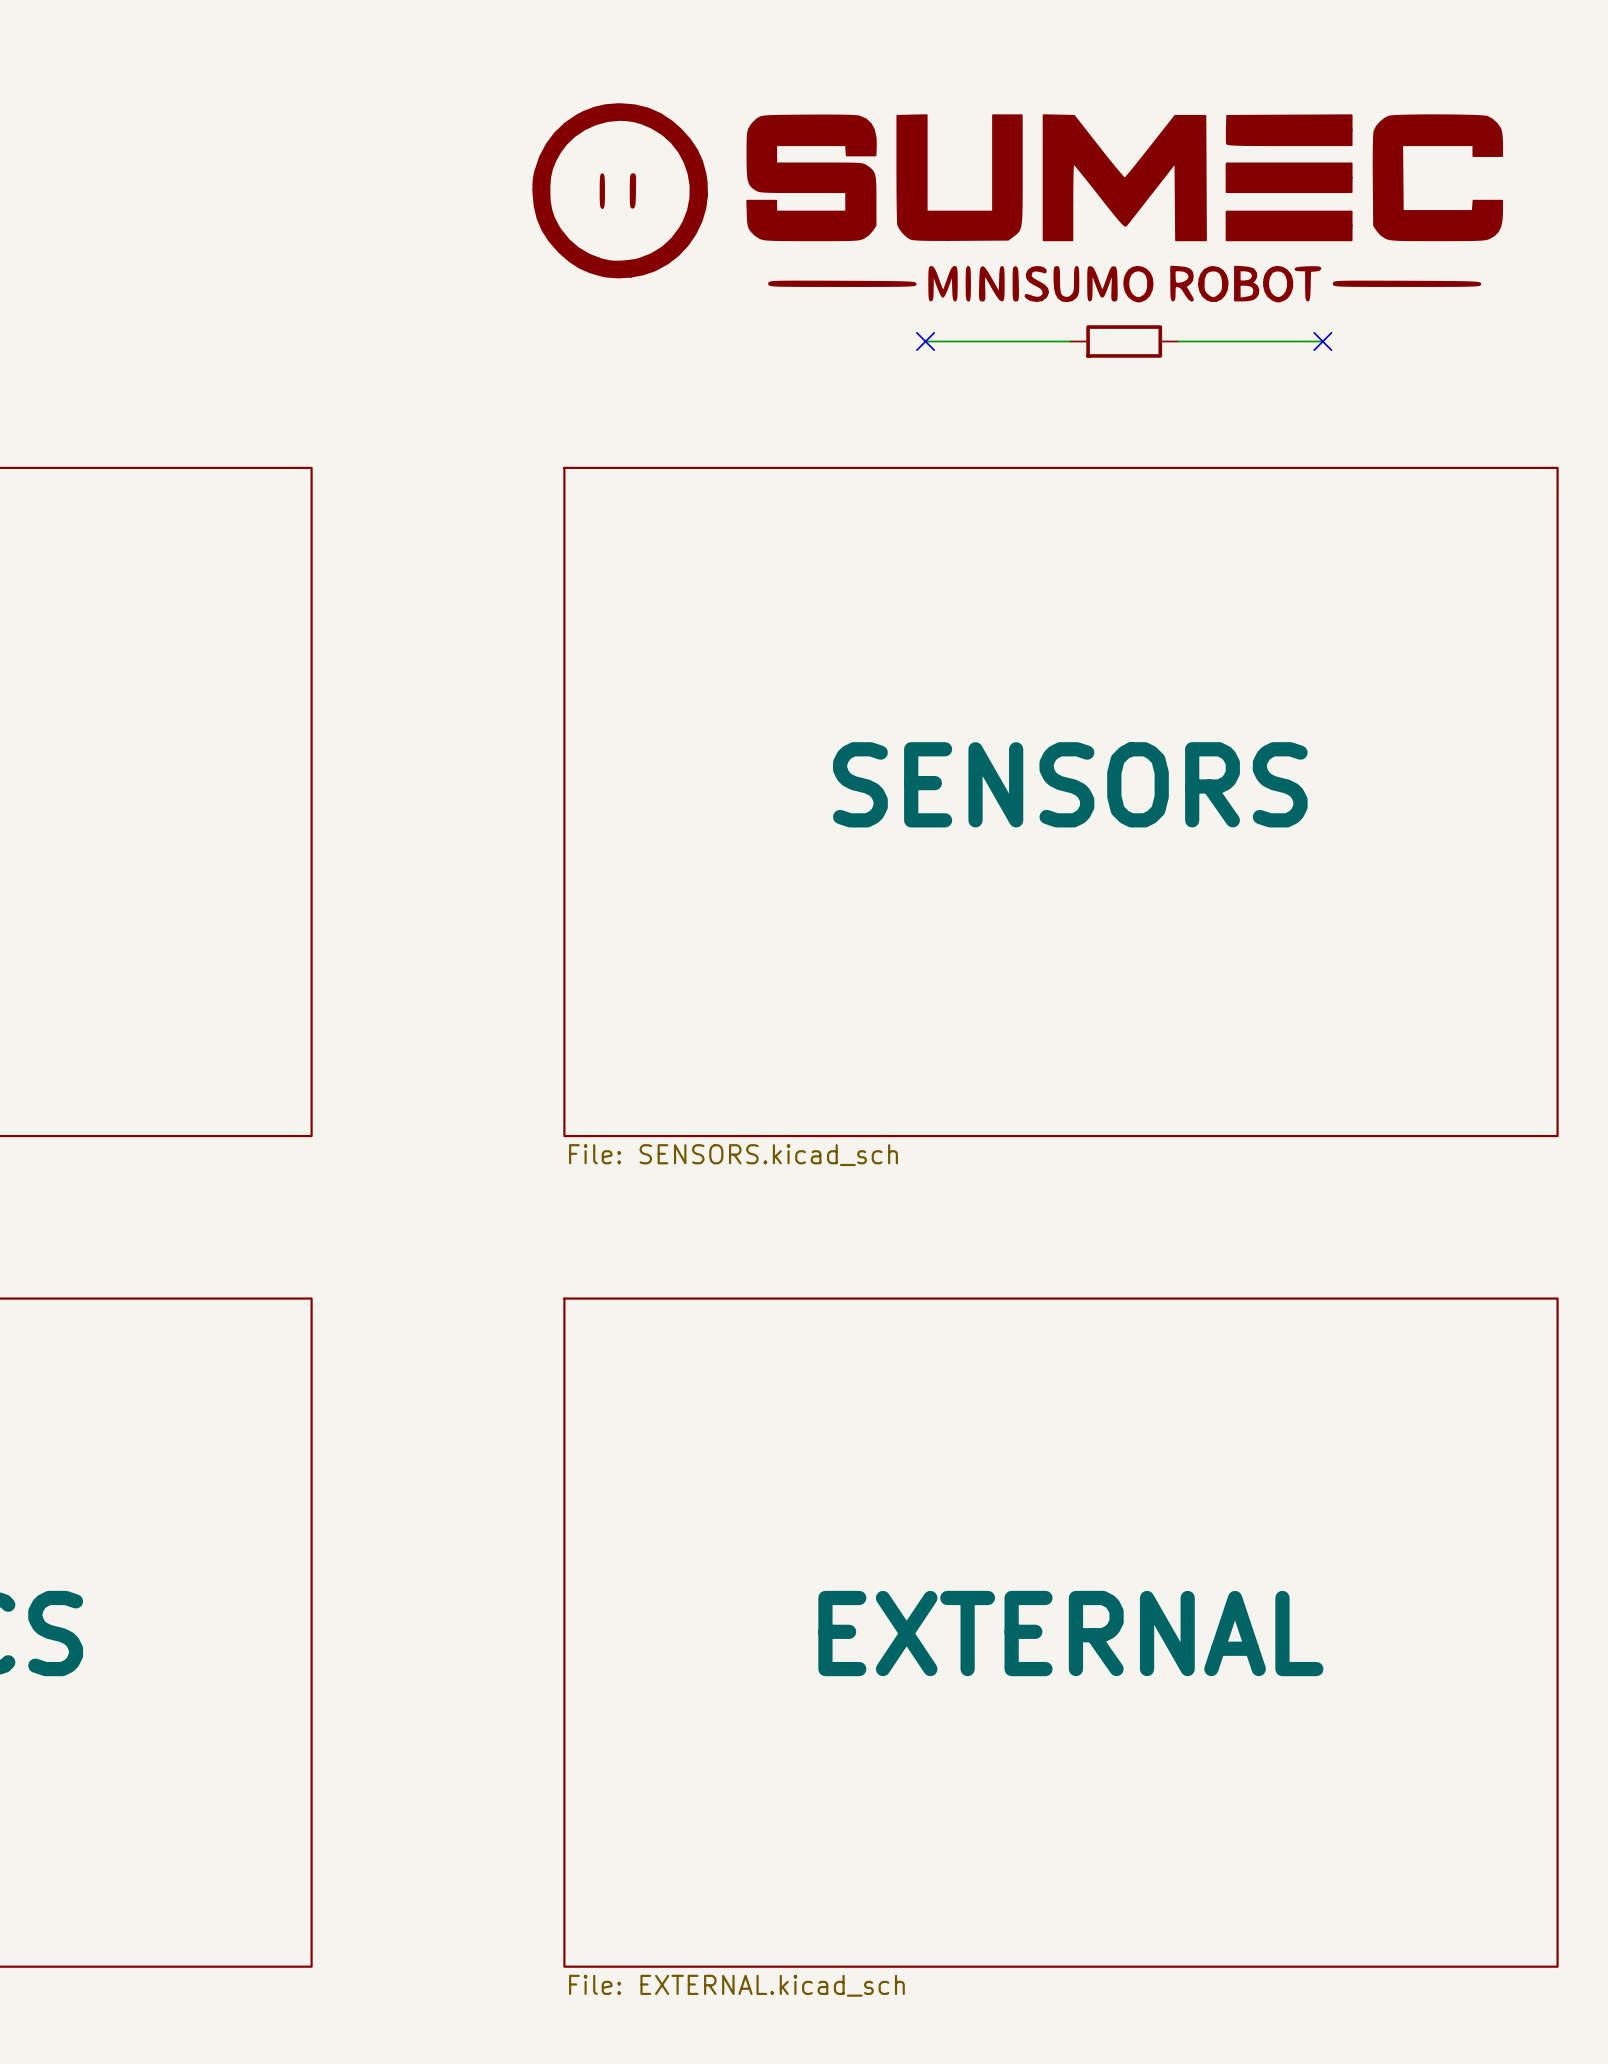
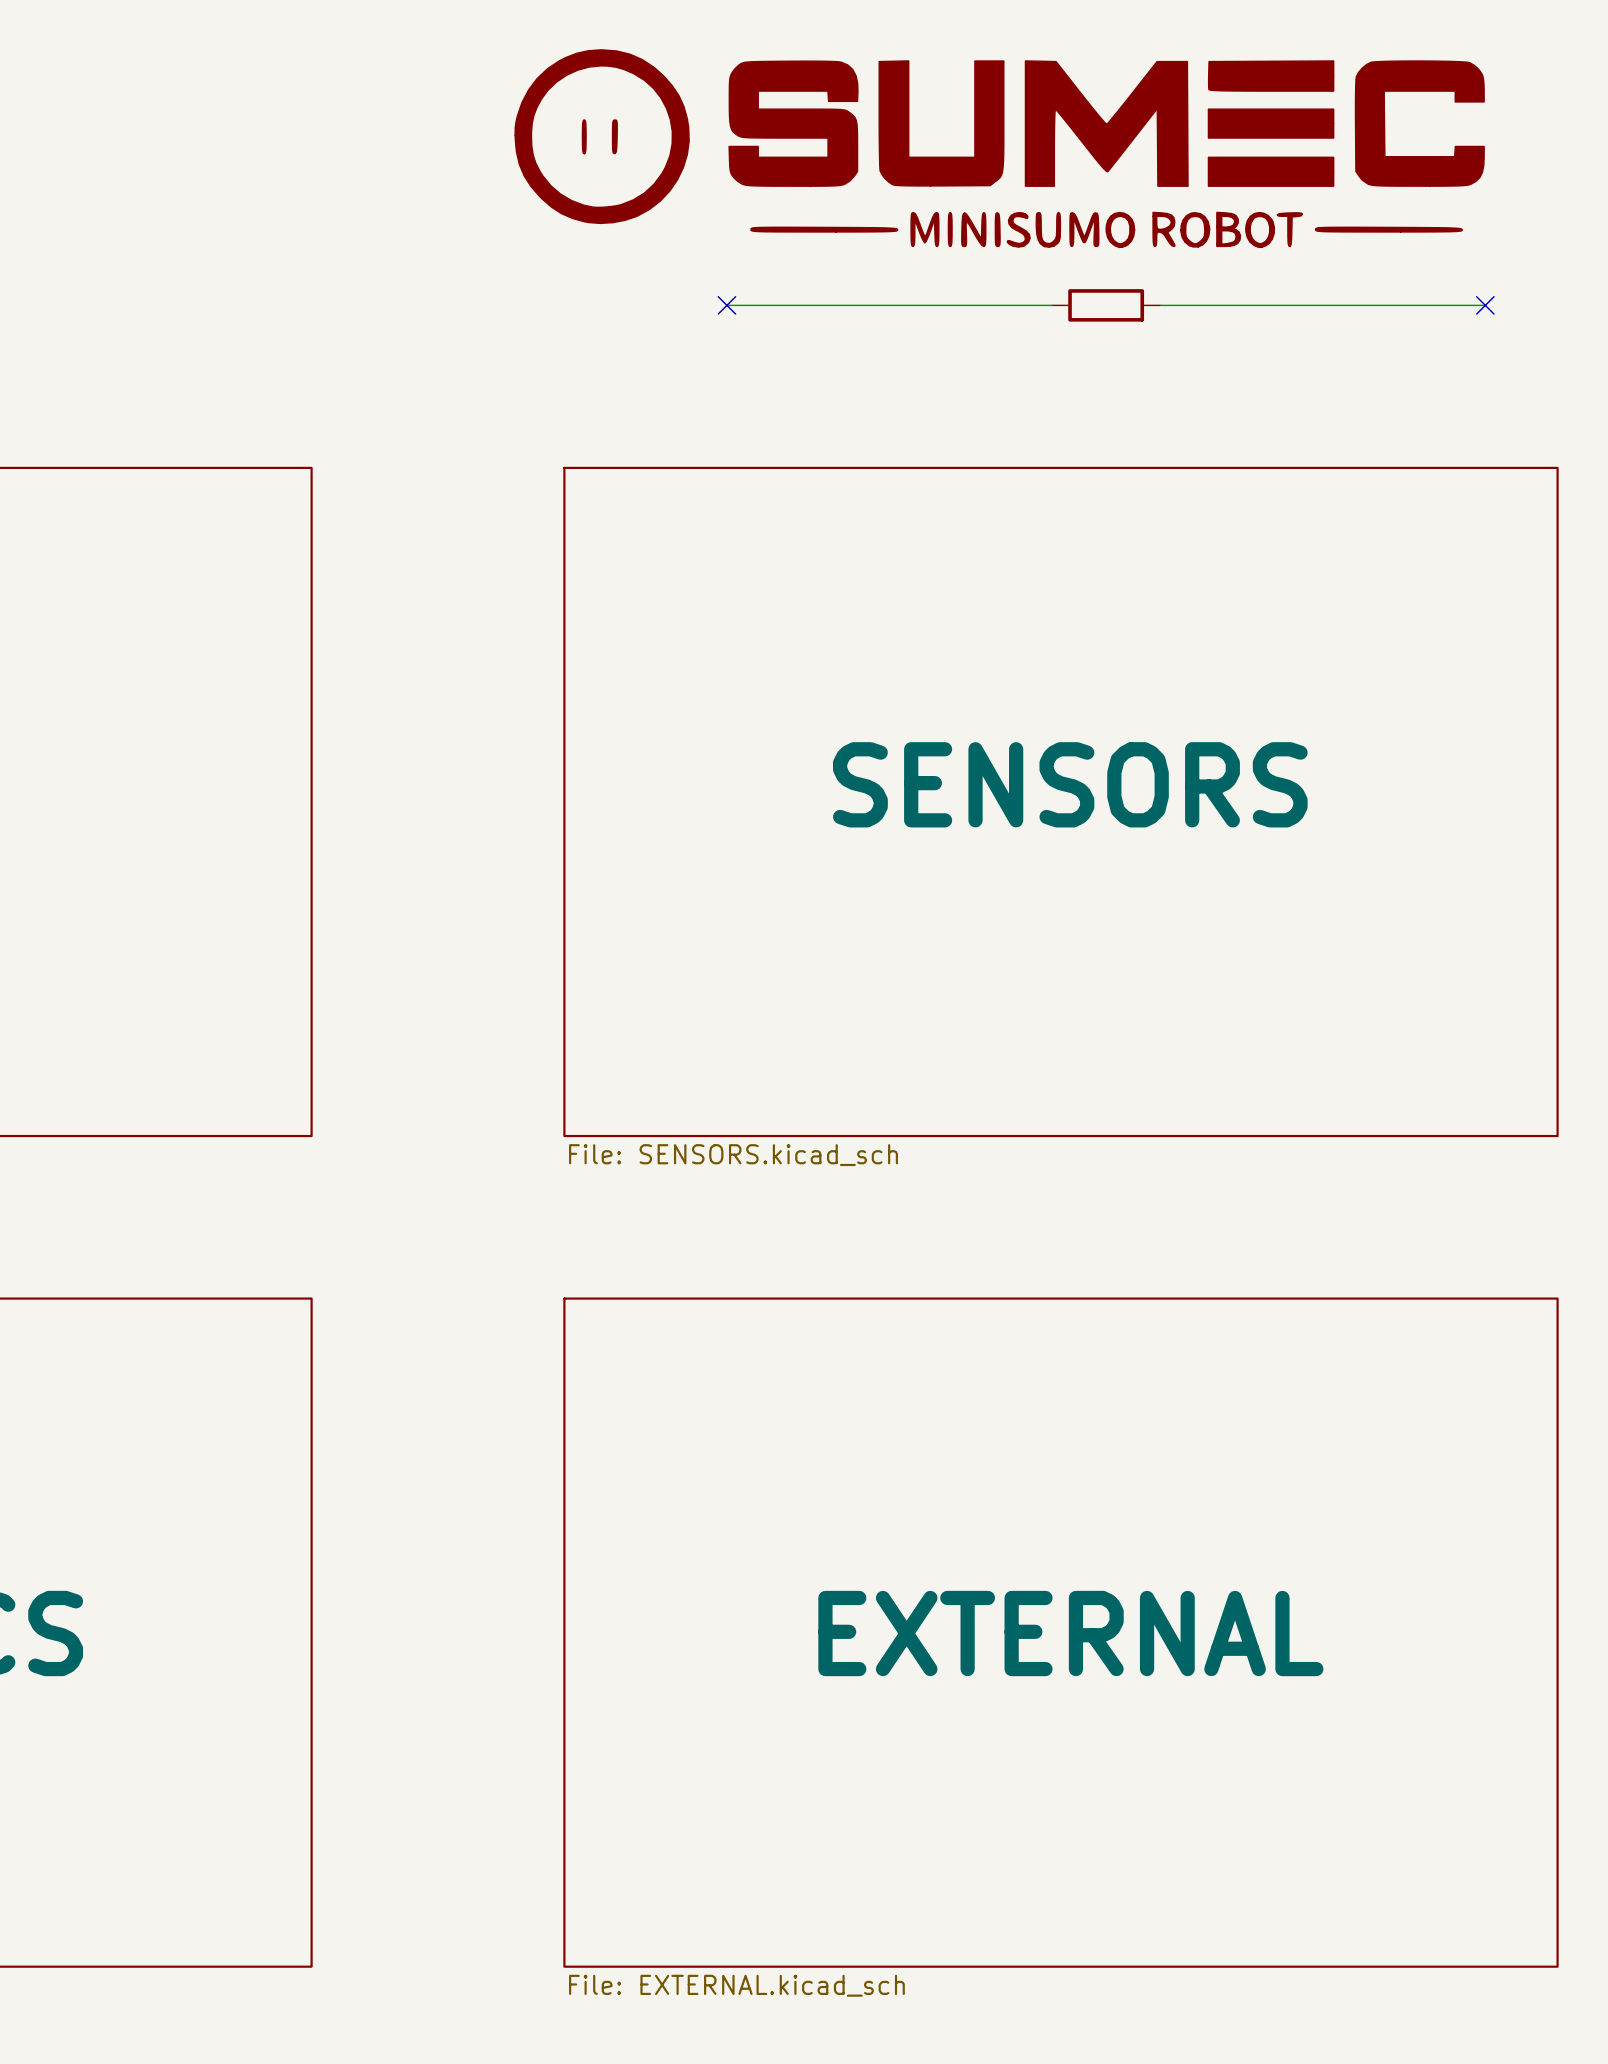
power symbol position: (1017, 202) -> (999, 148)
wire: none -> (726, 305) (1051, 305)
no-connect mark: none -> (726, 305)
wire: none -> (1160, 305) (1485, 305)
no-connect mark: none -> (1485, 305)
wire: (925, 341) (1070, 341) -> none
no-connect mark: (925, 341) -> none
part position: (1124, 341) -> (1106, 305)
wire: (1178, 341) (1322, 341) -> none
no-connect mark: (1322, 341) -> none

